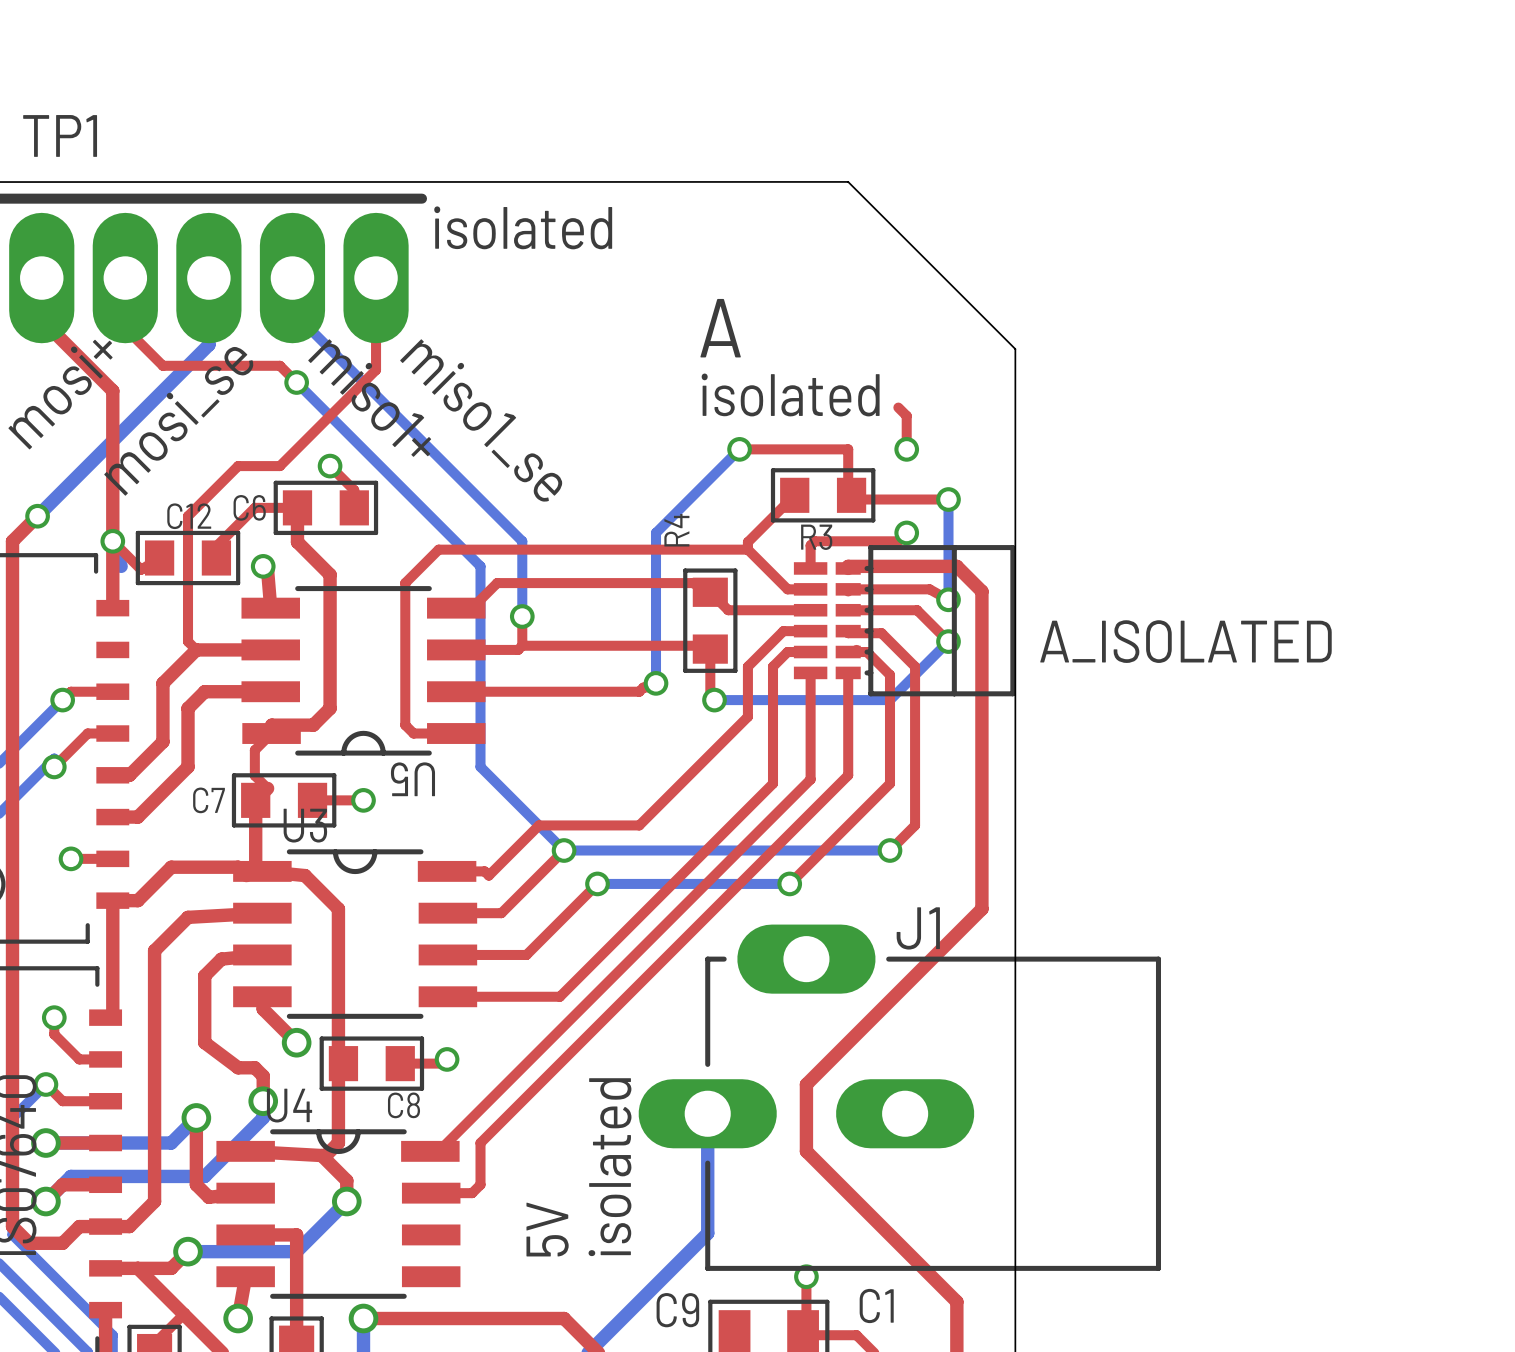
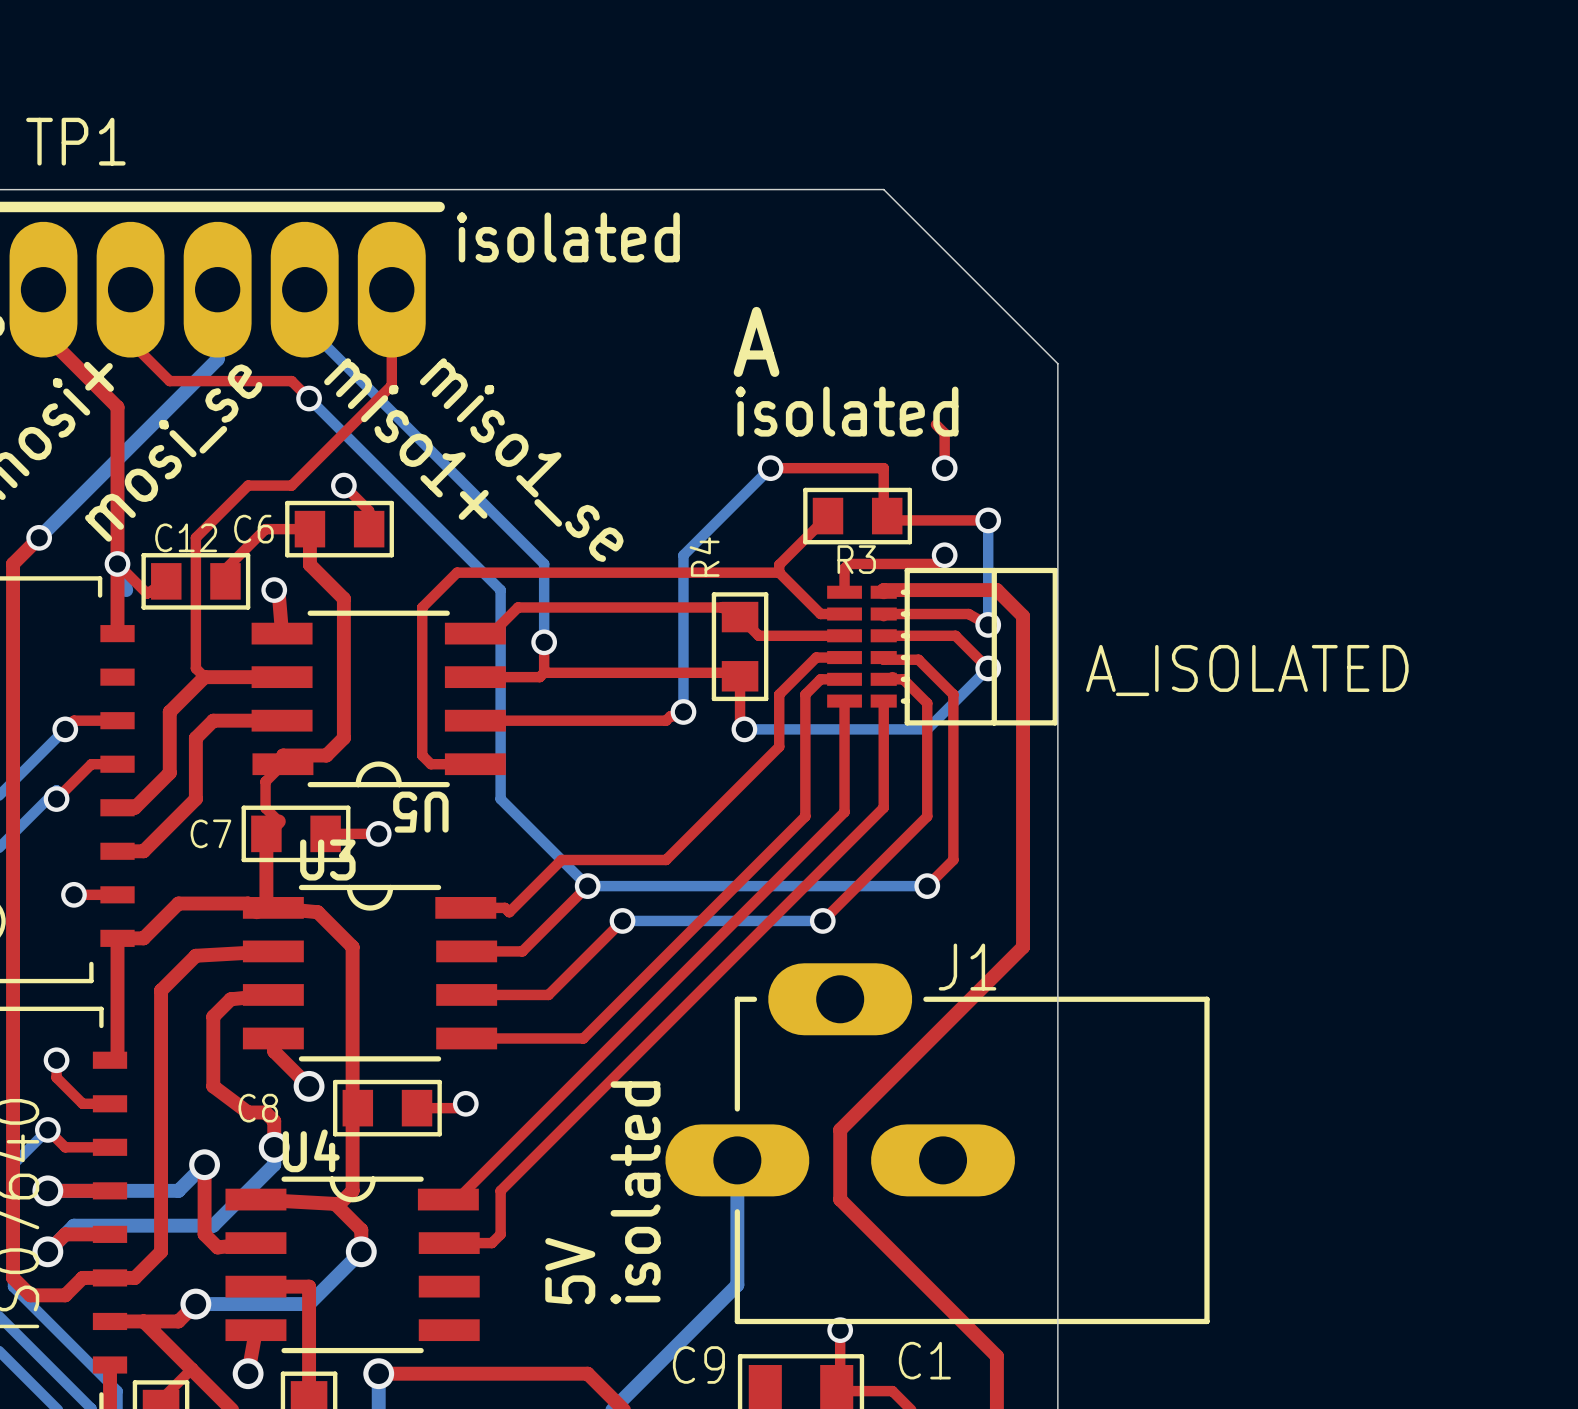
C8 name position: C8 (404, 1105) -> C8 (258, 1108)

